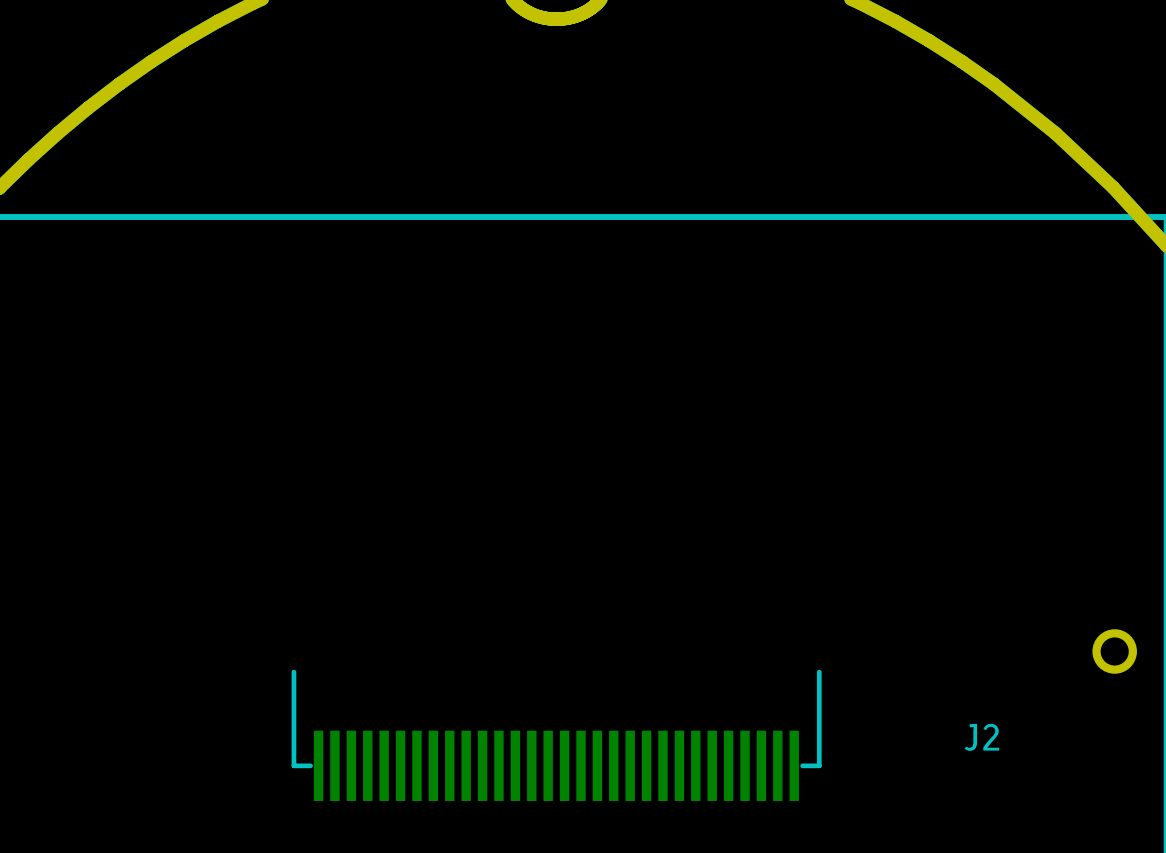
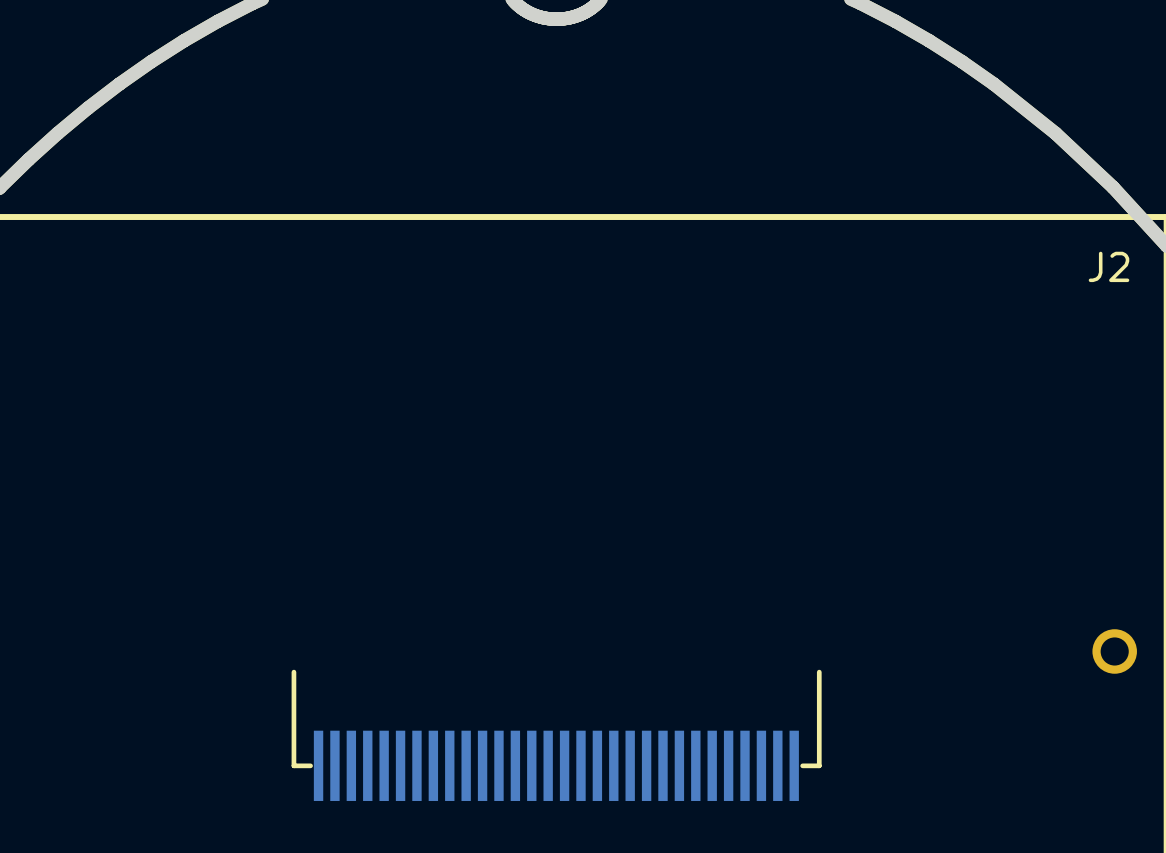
J2 name position: J2 (981, 737) -> J2 (1109, 266)

